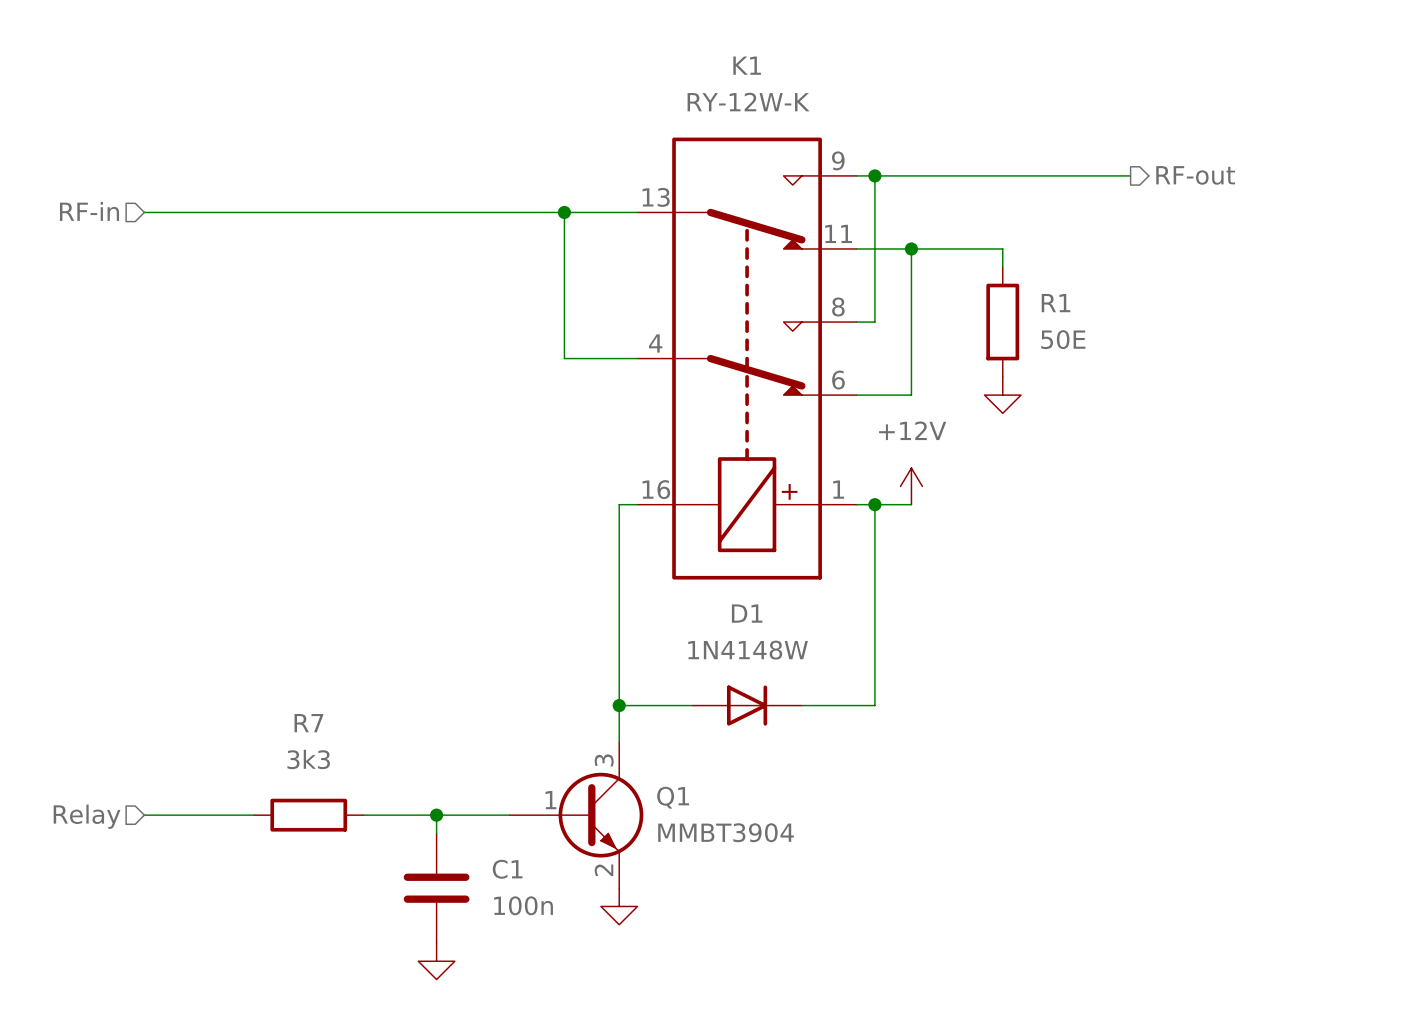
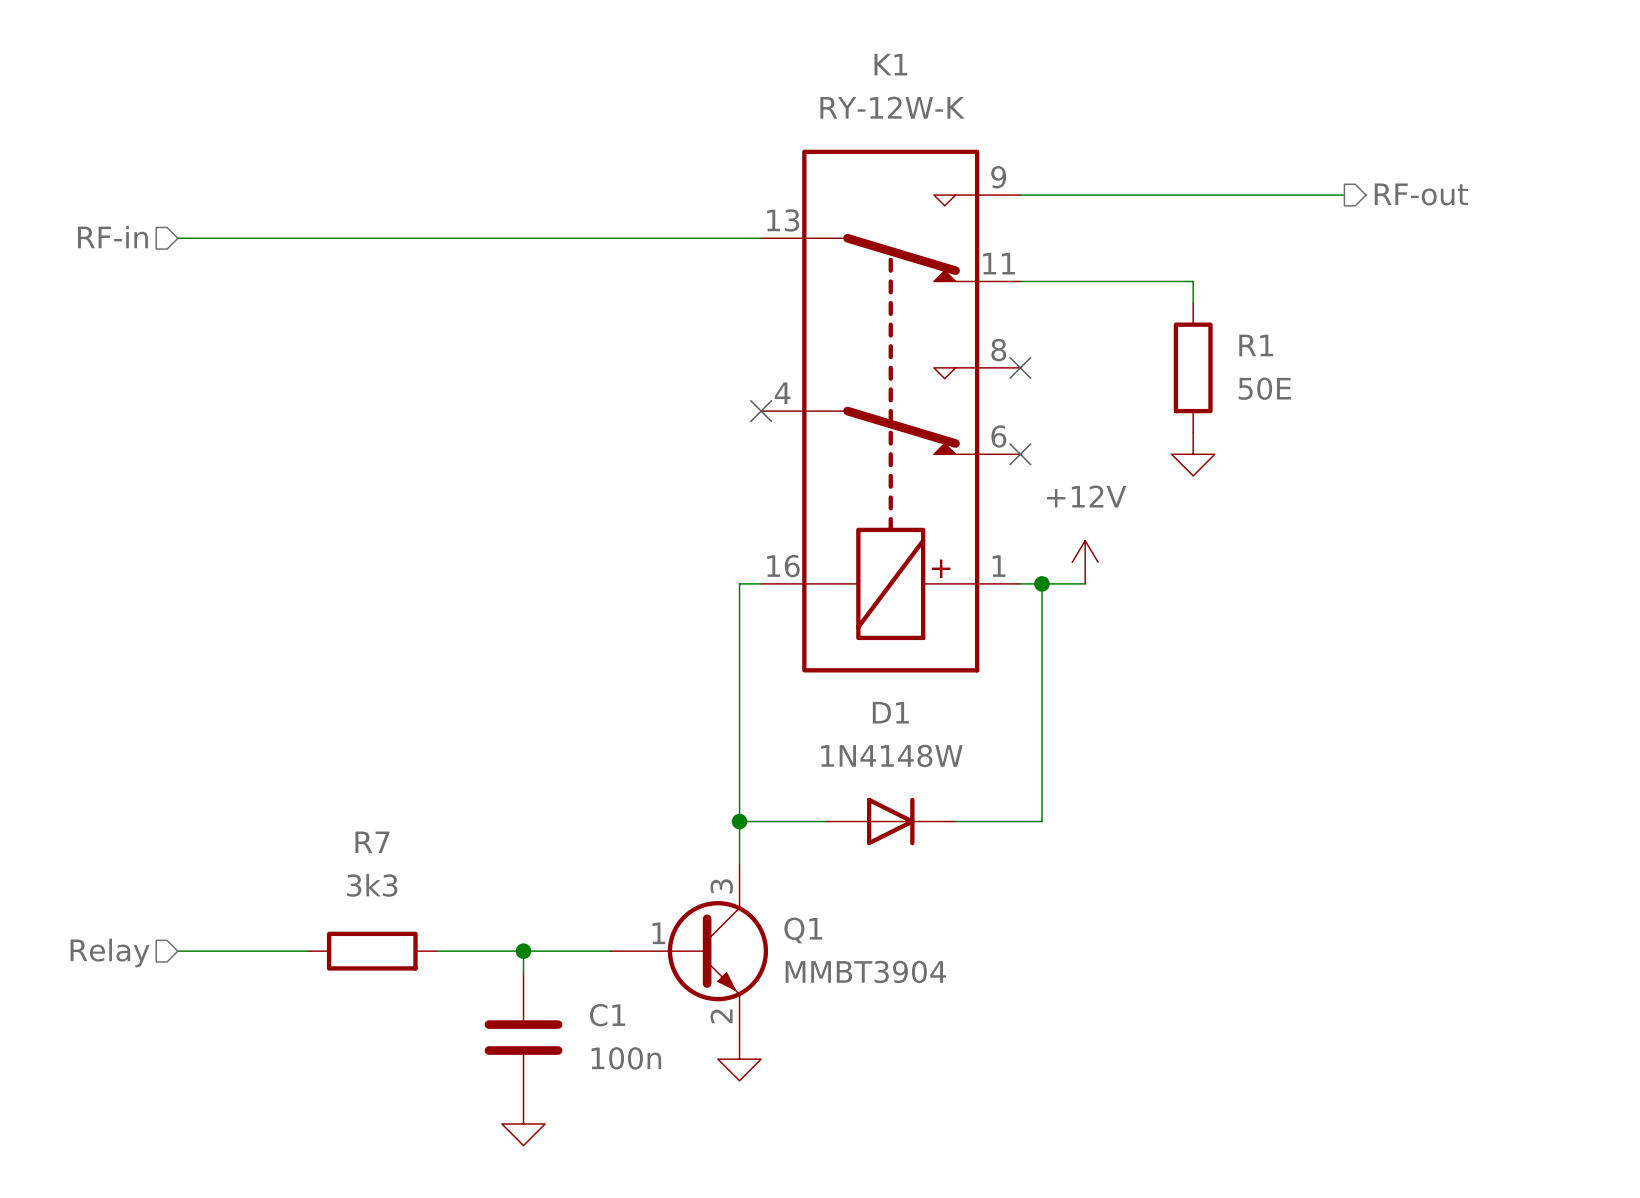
wire: (874, 175) (874, 322) (856, 322) -> none
junction: (874, 175) -> none
wire: (564, 212) (564, 358) (637, 358) -> none
junction: (564, 212) -> none
wire: (911, 248) (911, 395) (856, 395) -> none
junction: (911, 248) -> none
no-connect mark: none -> (1020, 367)
no-connect mark: none -> (761, 411)
no-connect mark: none -> (1020, 454)

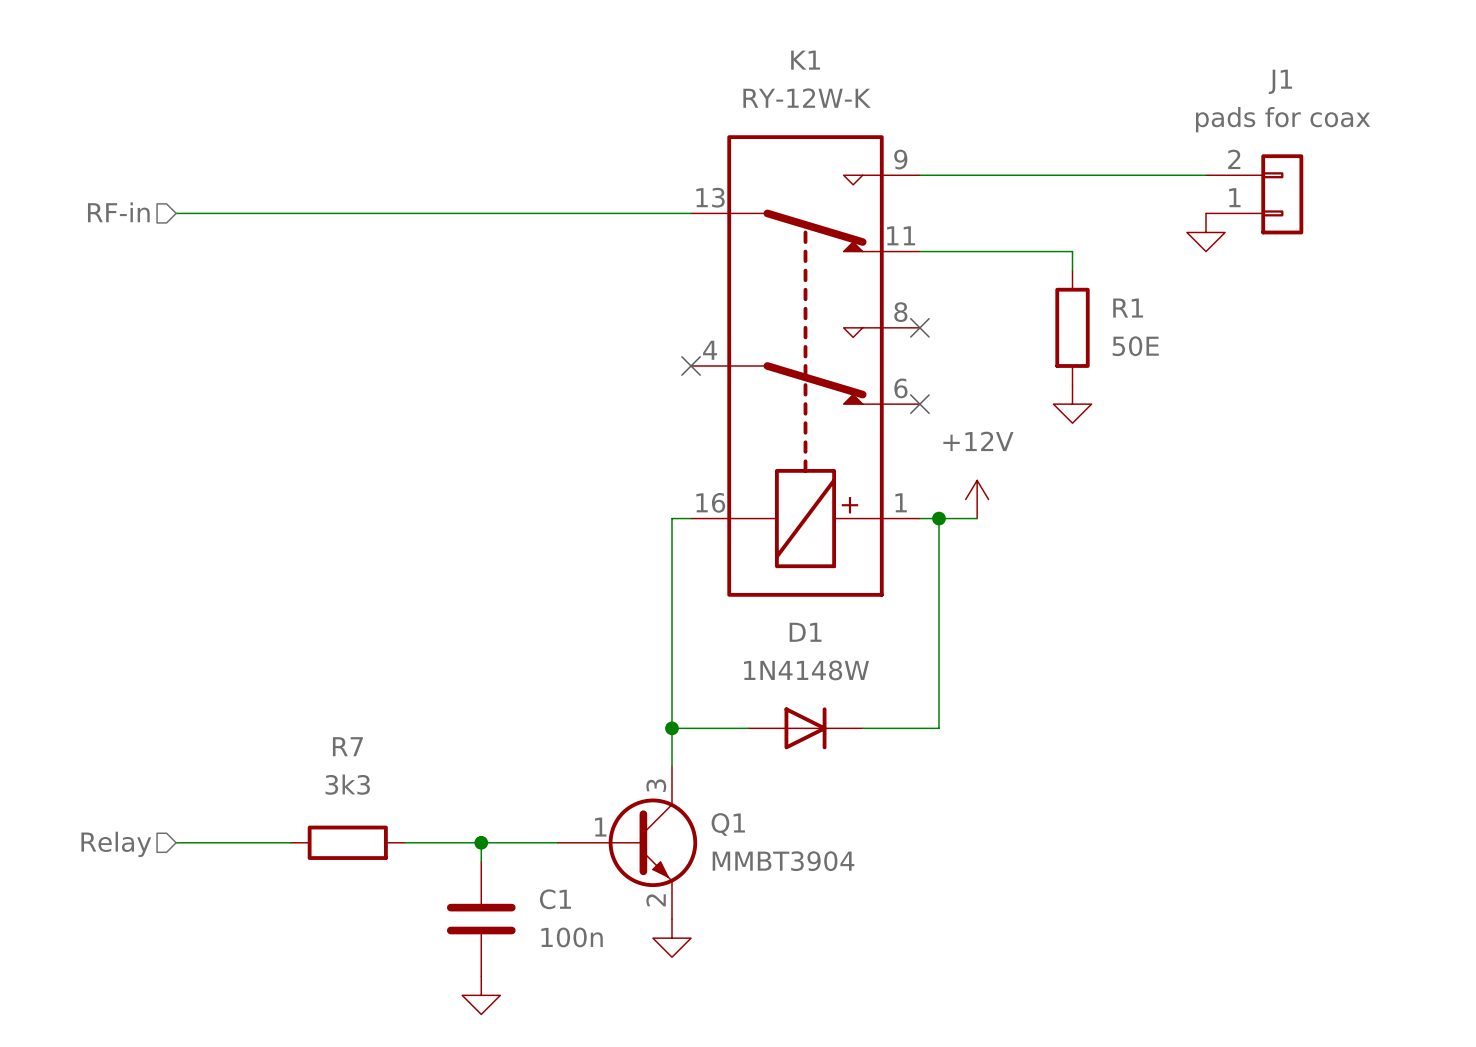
hierarchical label: RF-out (1421, 194) -> none
J1: none -> pads for coax (1254, 194)
power symbol: none -> (1206, 232)

